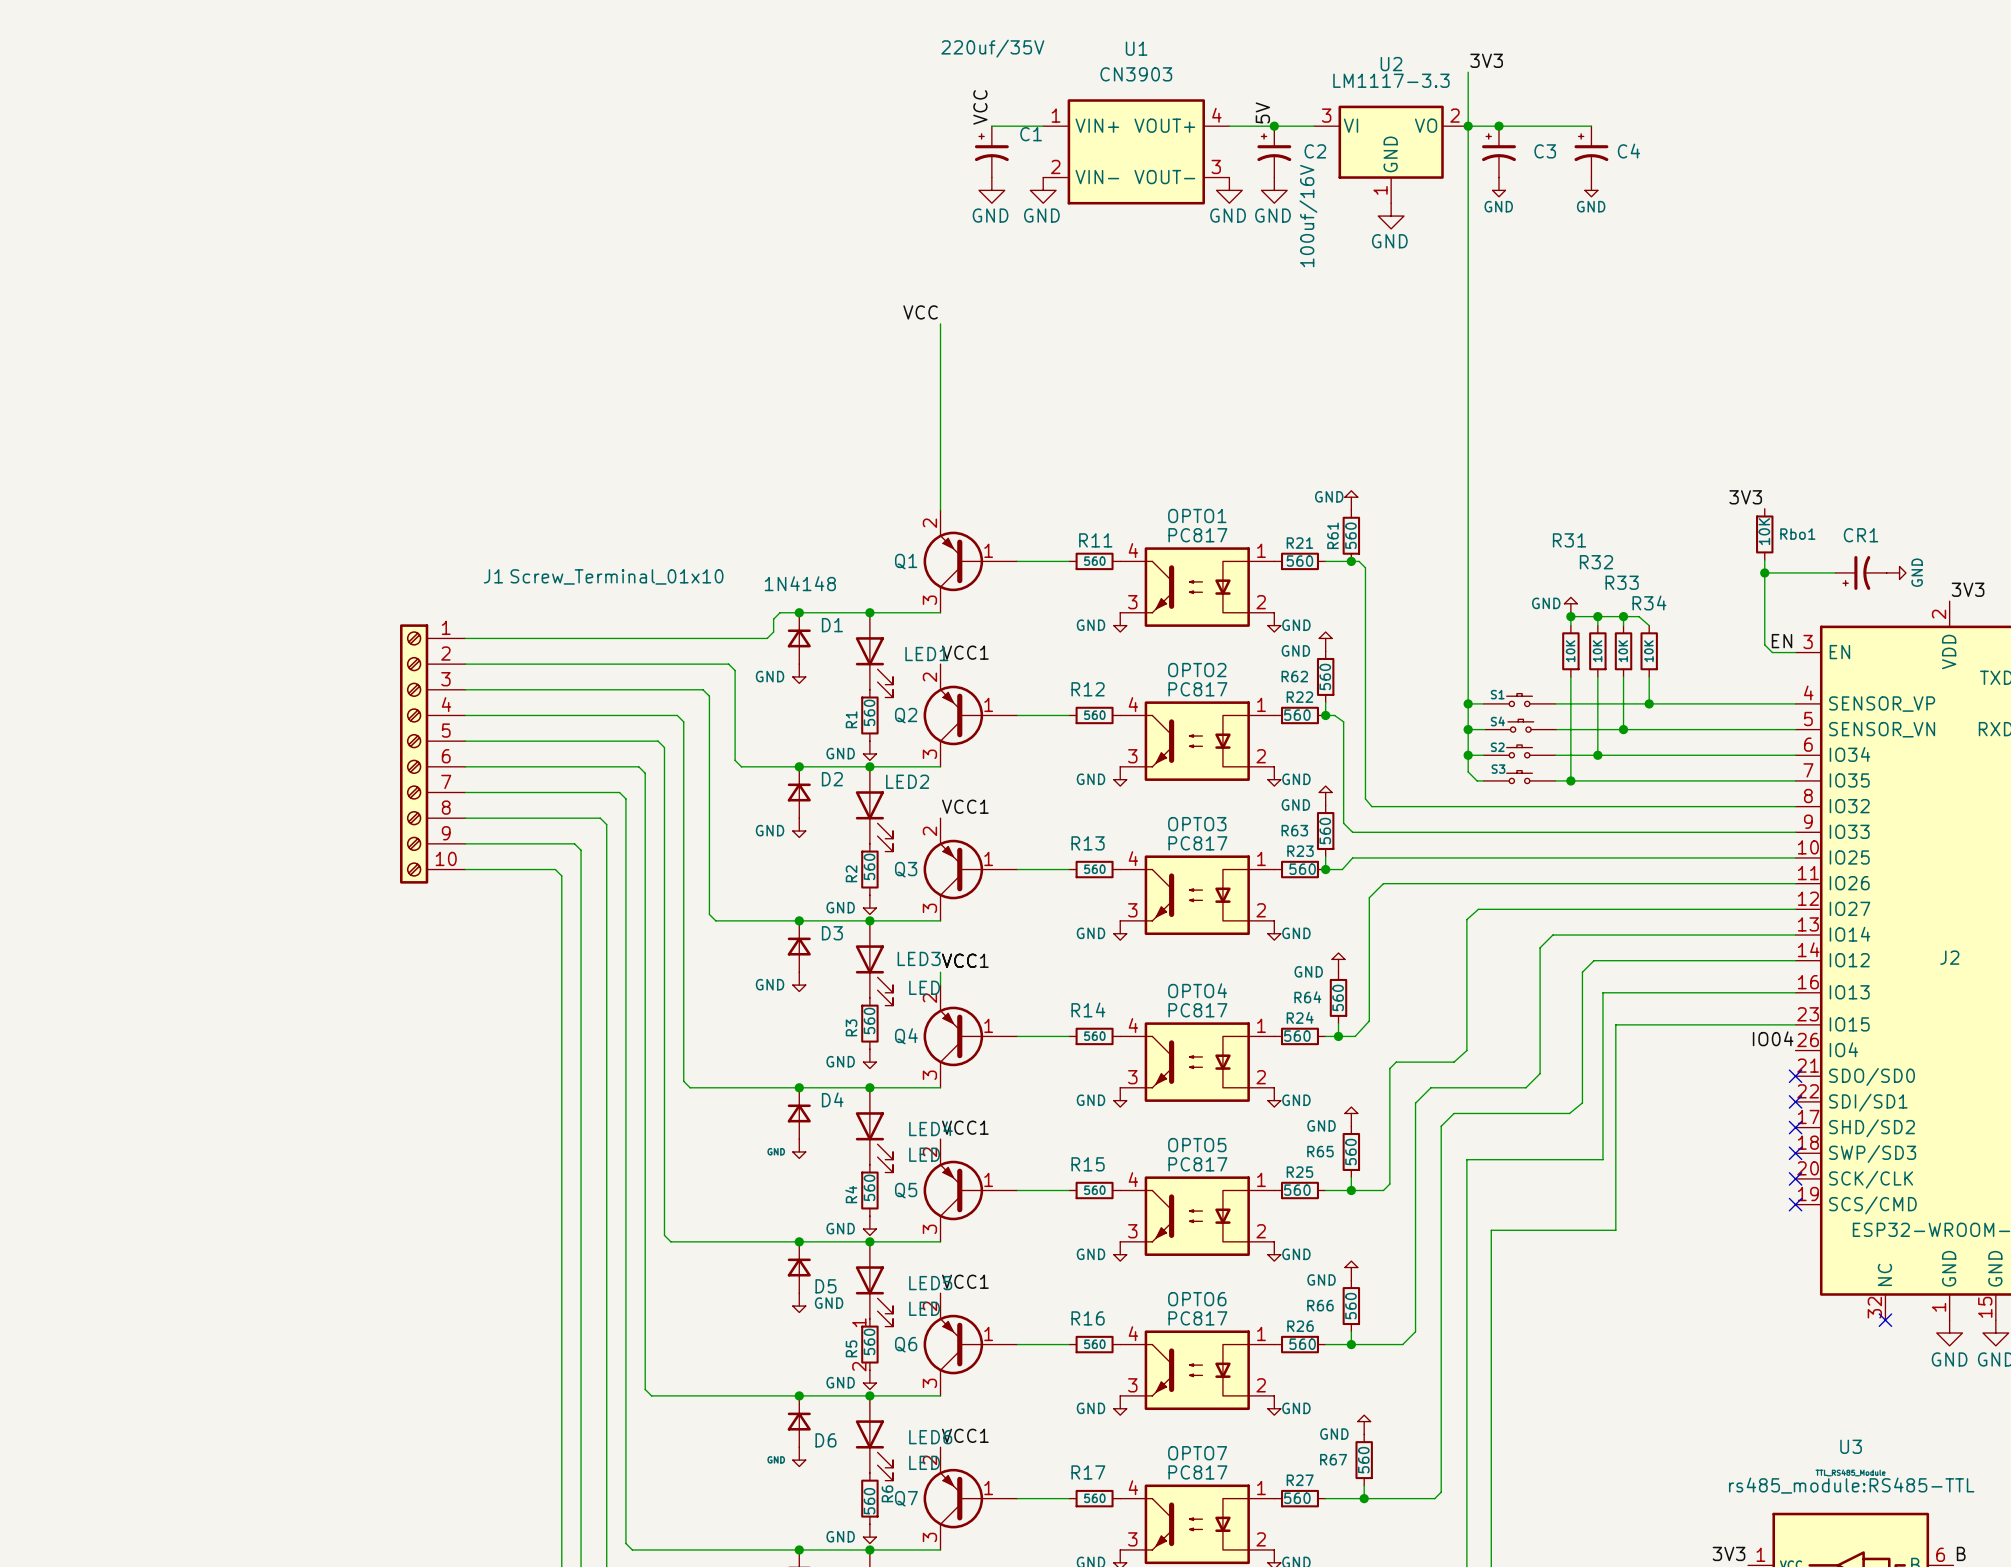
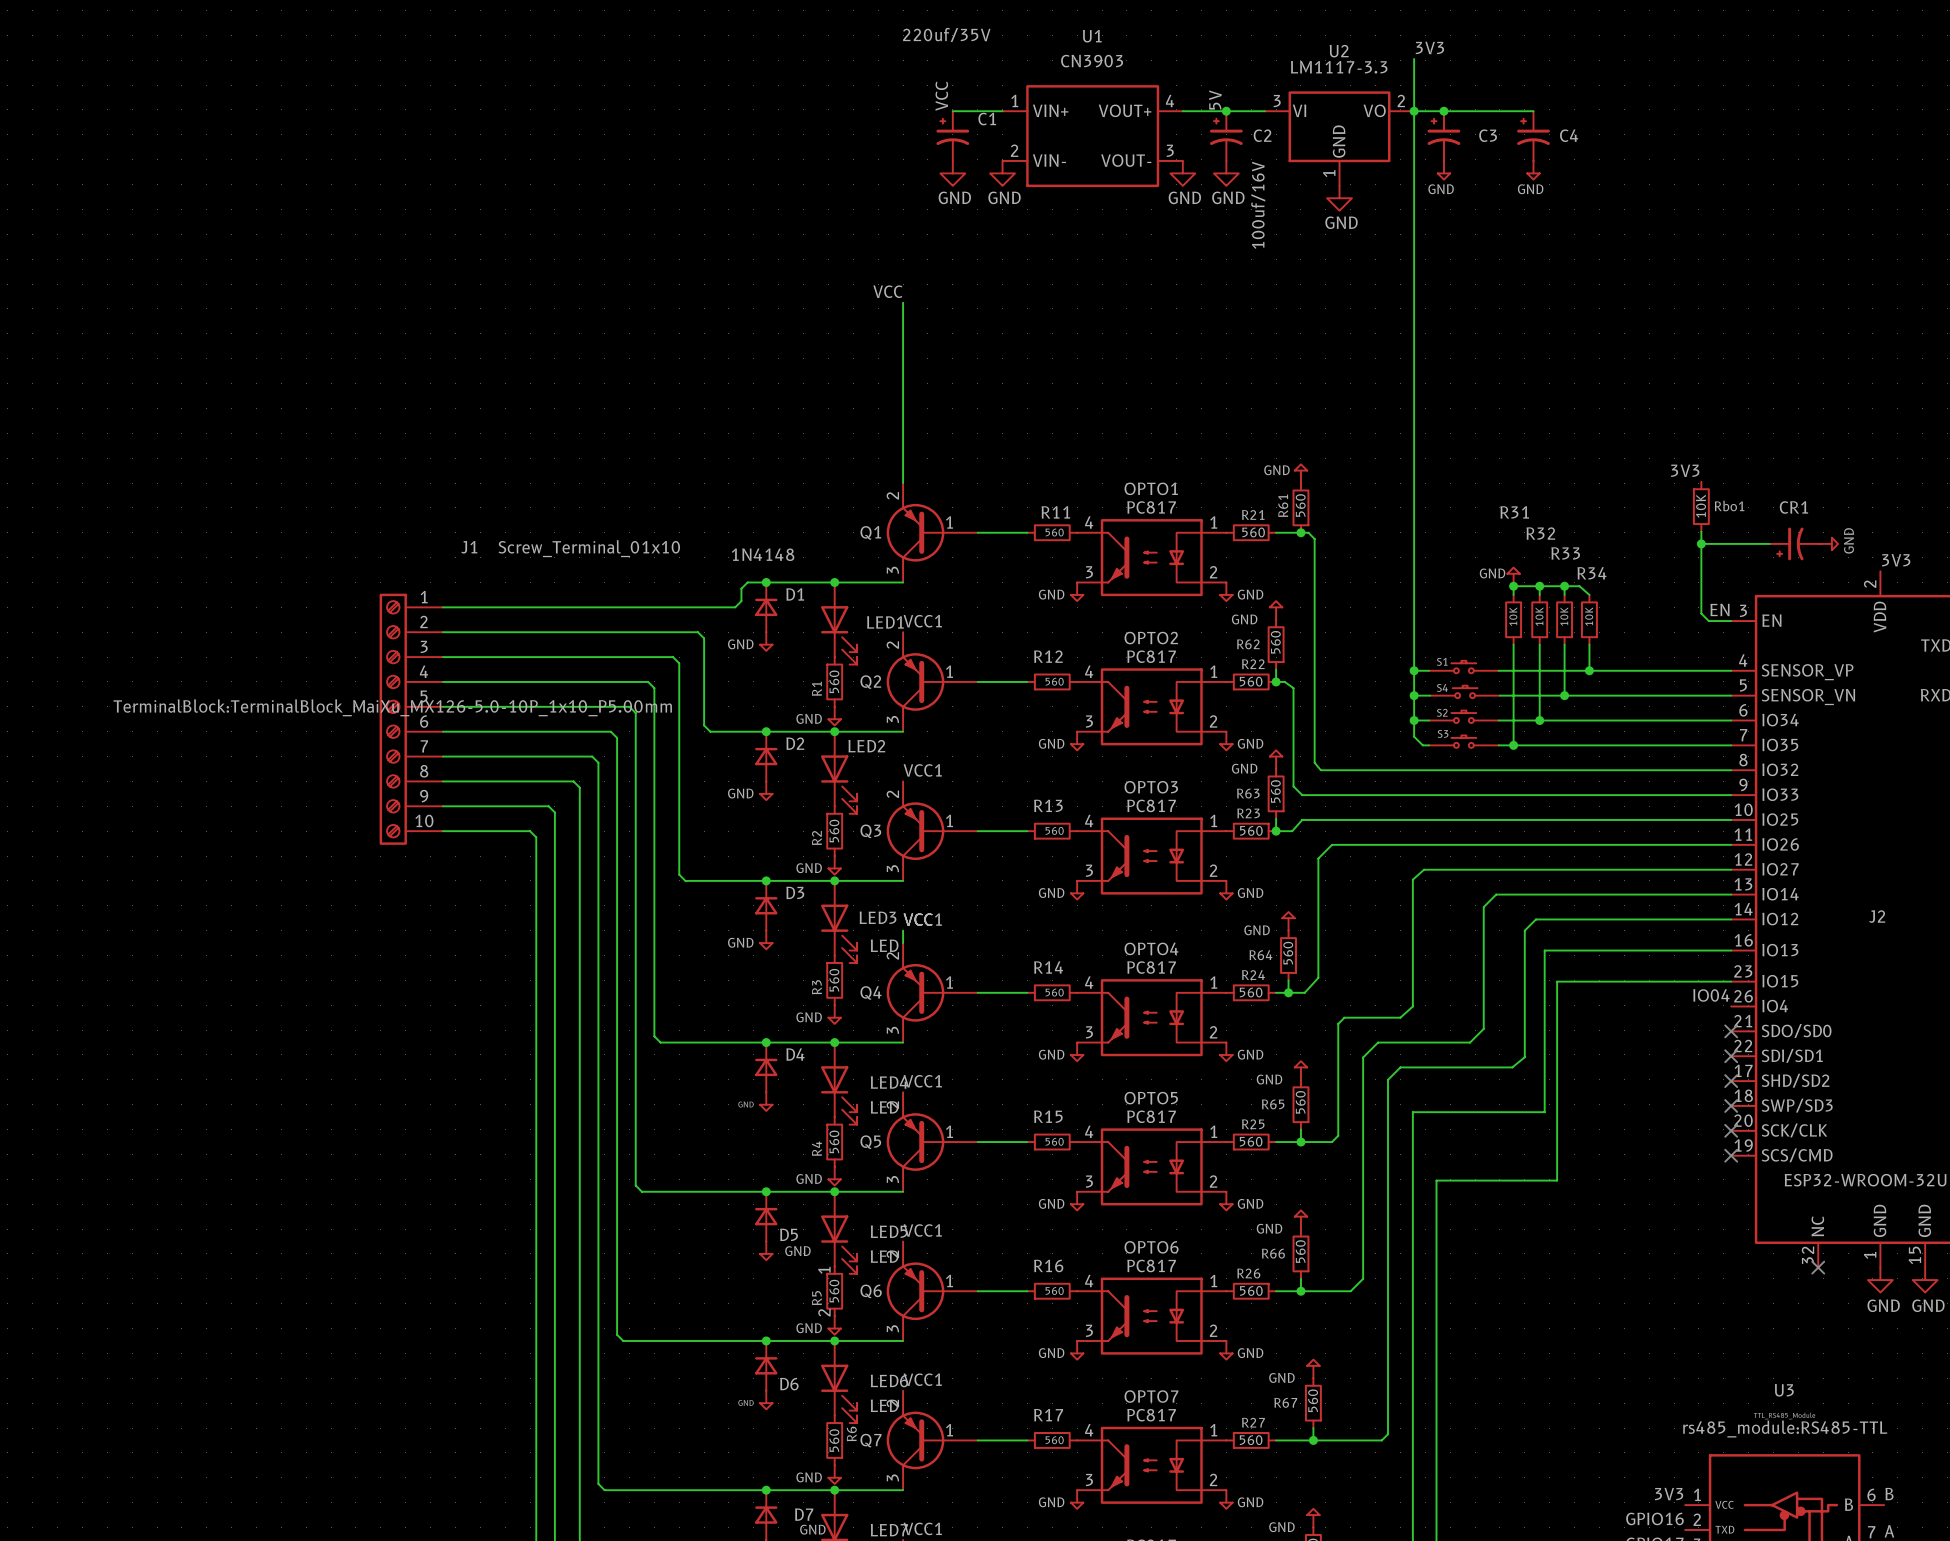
J1 text: none -> TerminalBlock:TerminalBlock_MaiXu_MX126-5.0-10P_1x10_P5.00mm (392, 707)

